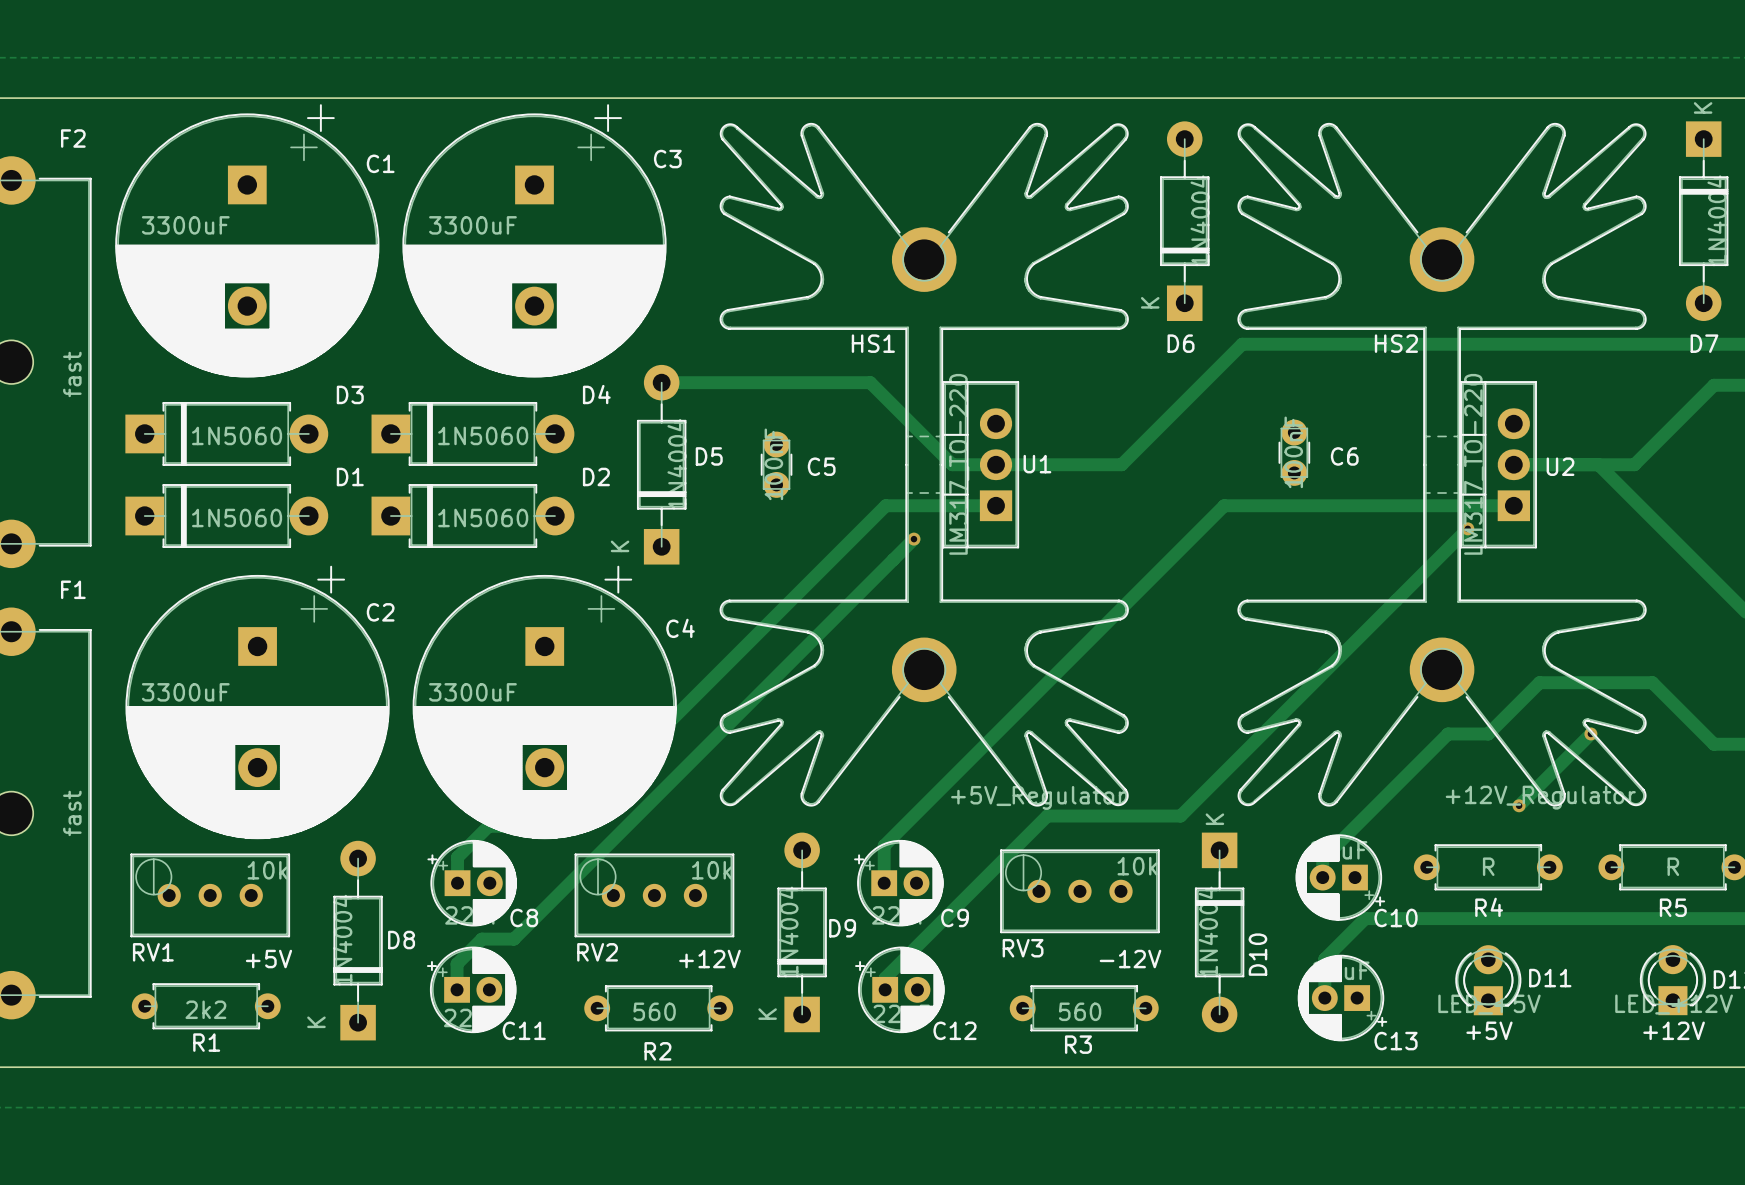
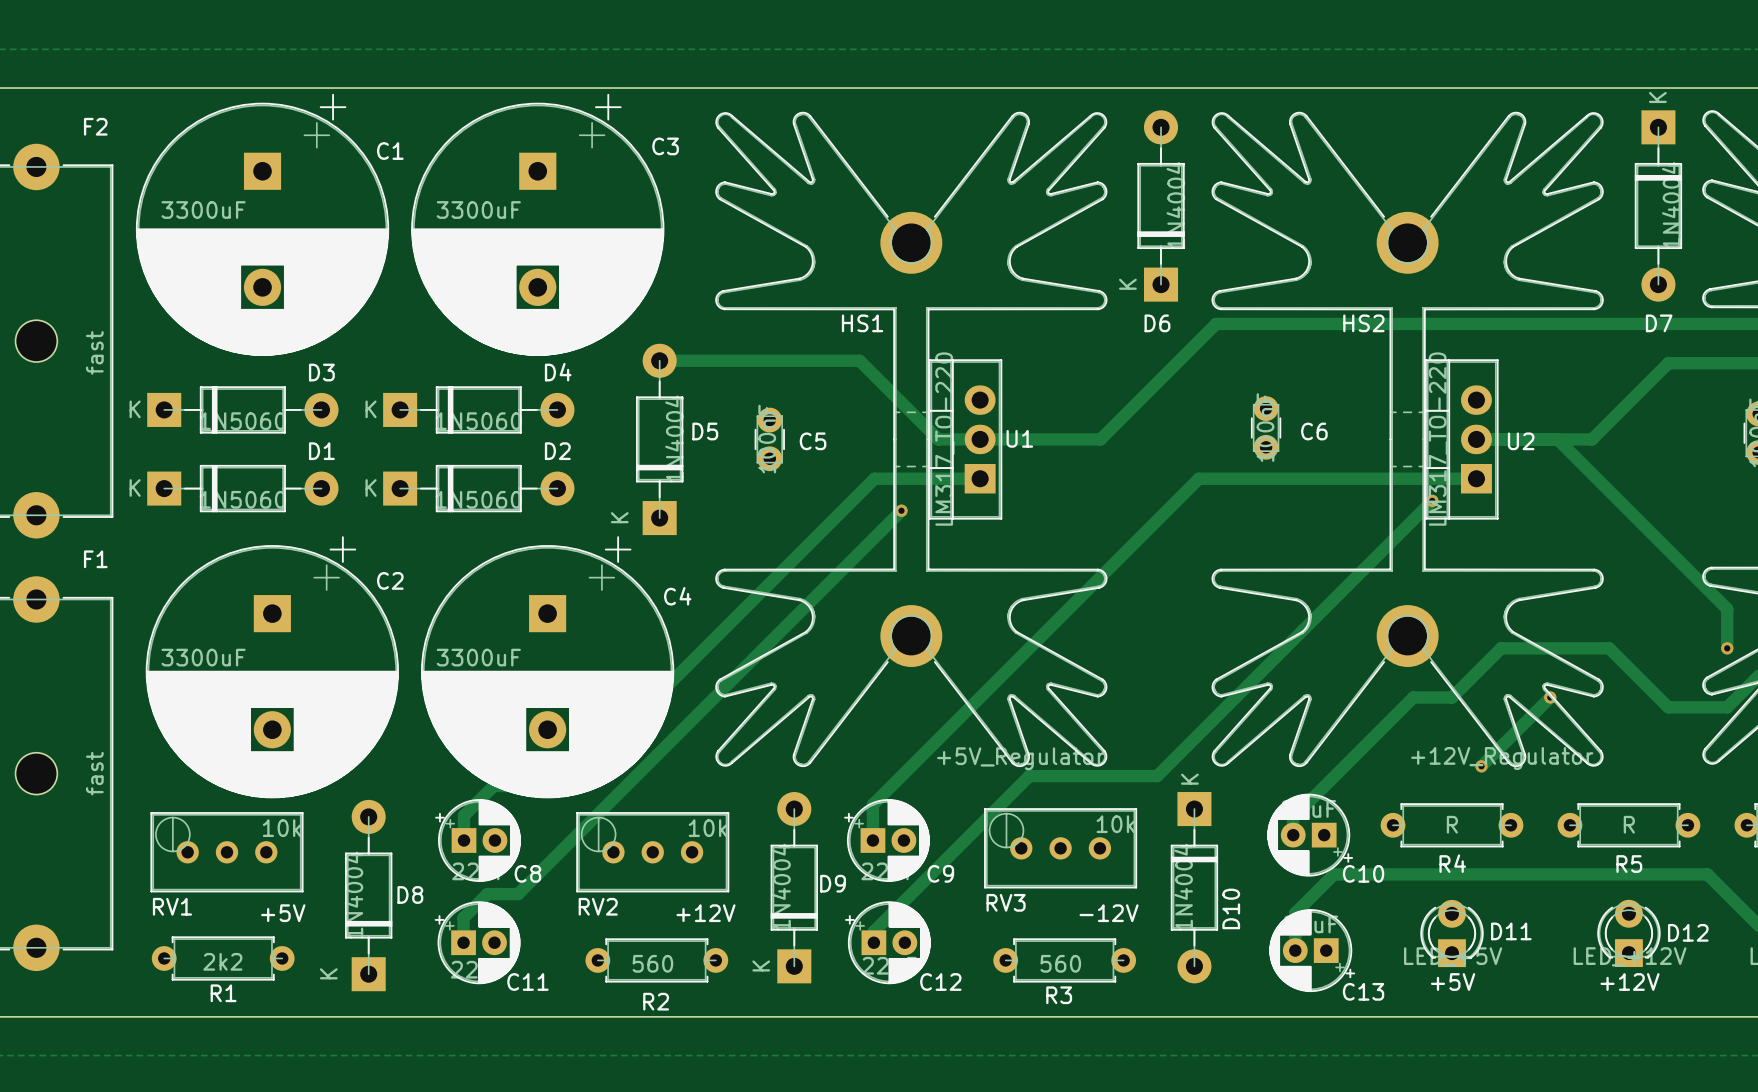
D3 name position: D3 (350, 394) -> D3 (321, 372)
D4 name position: D4 (596, 394) -> D4 (558, 372)
D3 footprint: [125, 401, 329, 466] -> [147, 386, 339, 434]
D4 footprint: [371, 401, 575, 466] -> [383, 386, 575, 434]
D1 name position: D1 (350, 476) -> D1 (321, 451)
D2 name position: D2 (596, 476) -> D2 (557, 451)
D1 footprint: [125, 484, 329, 548] -> [147, 464, 339, 513]
D2 footprint: [371, 484, 575, 548] -> [383, 464, 575, 513]

